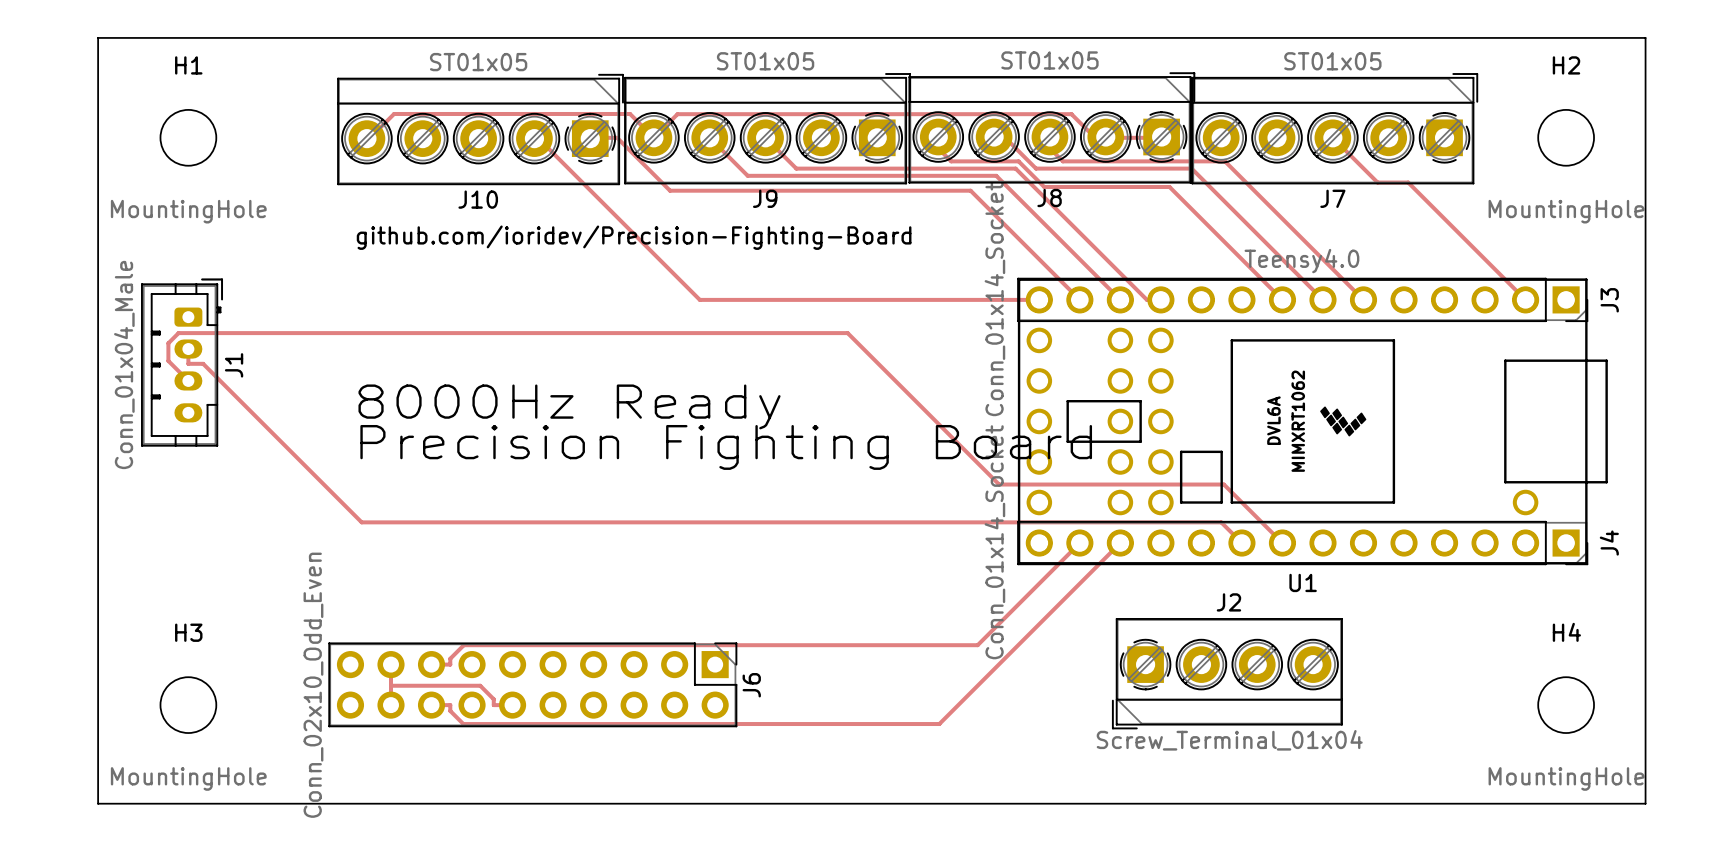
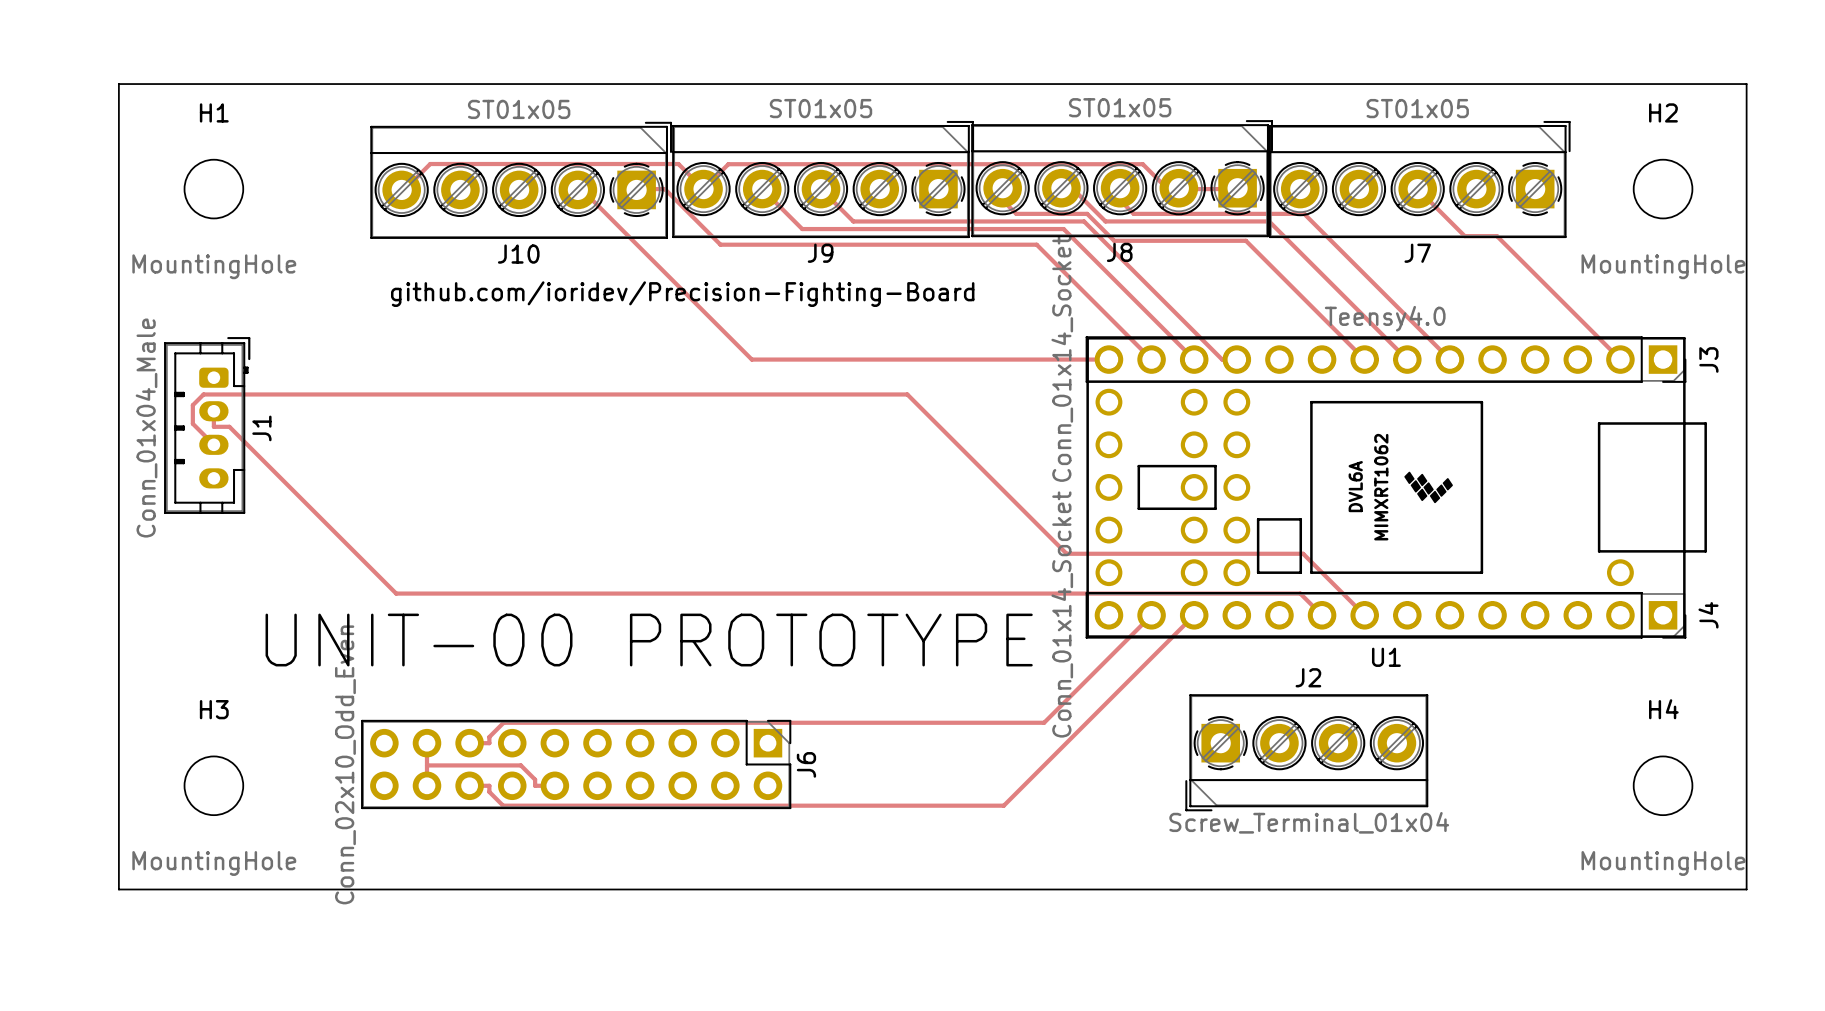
text: 8000Hz Ready (569, 406) -> none
text: Precision Fighting Board (726, 447) -> none
text: none -> UNIT-00 PROTOTYPE (649, 640)

